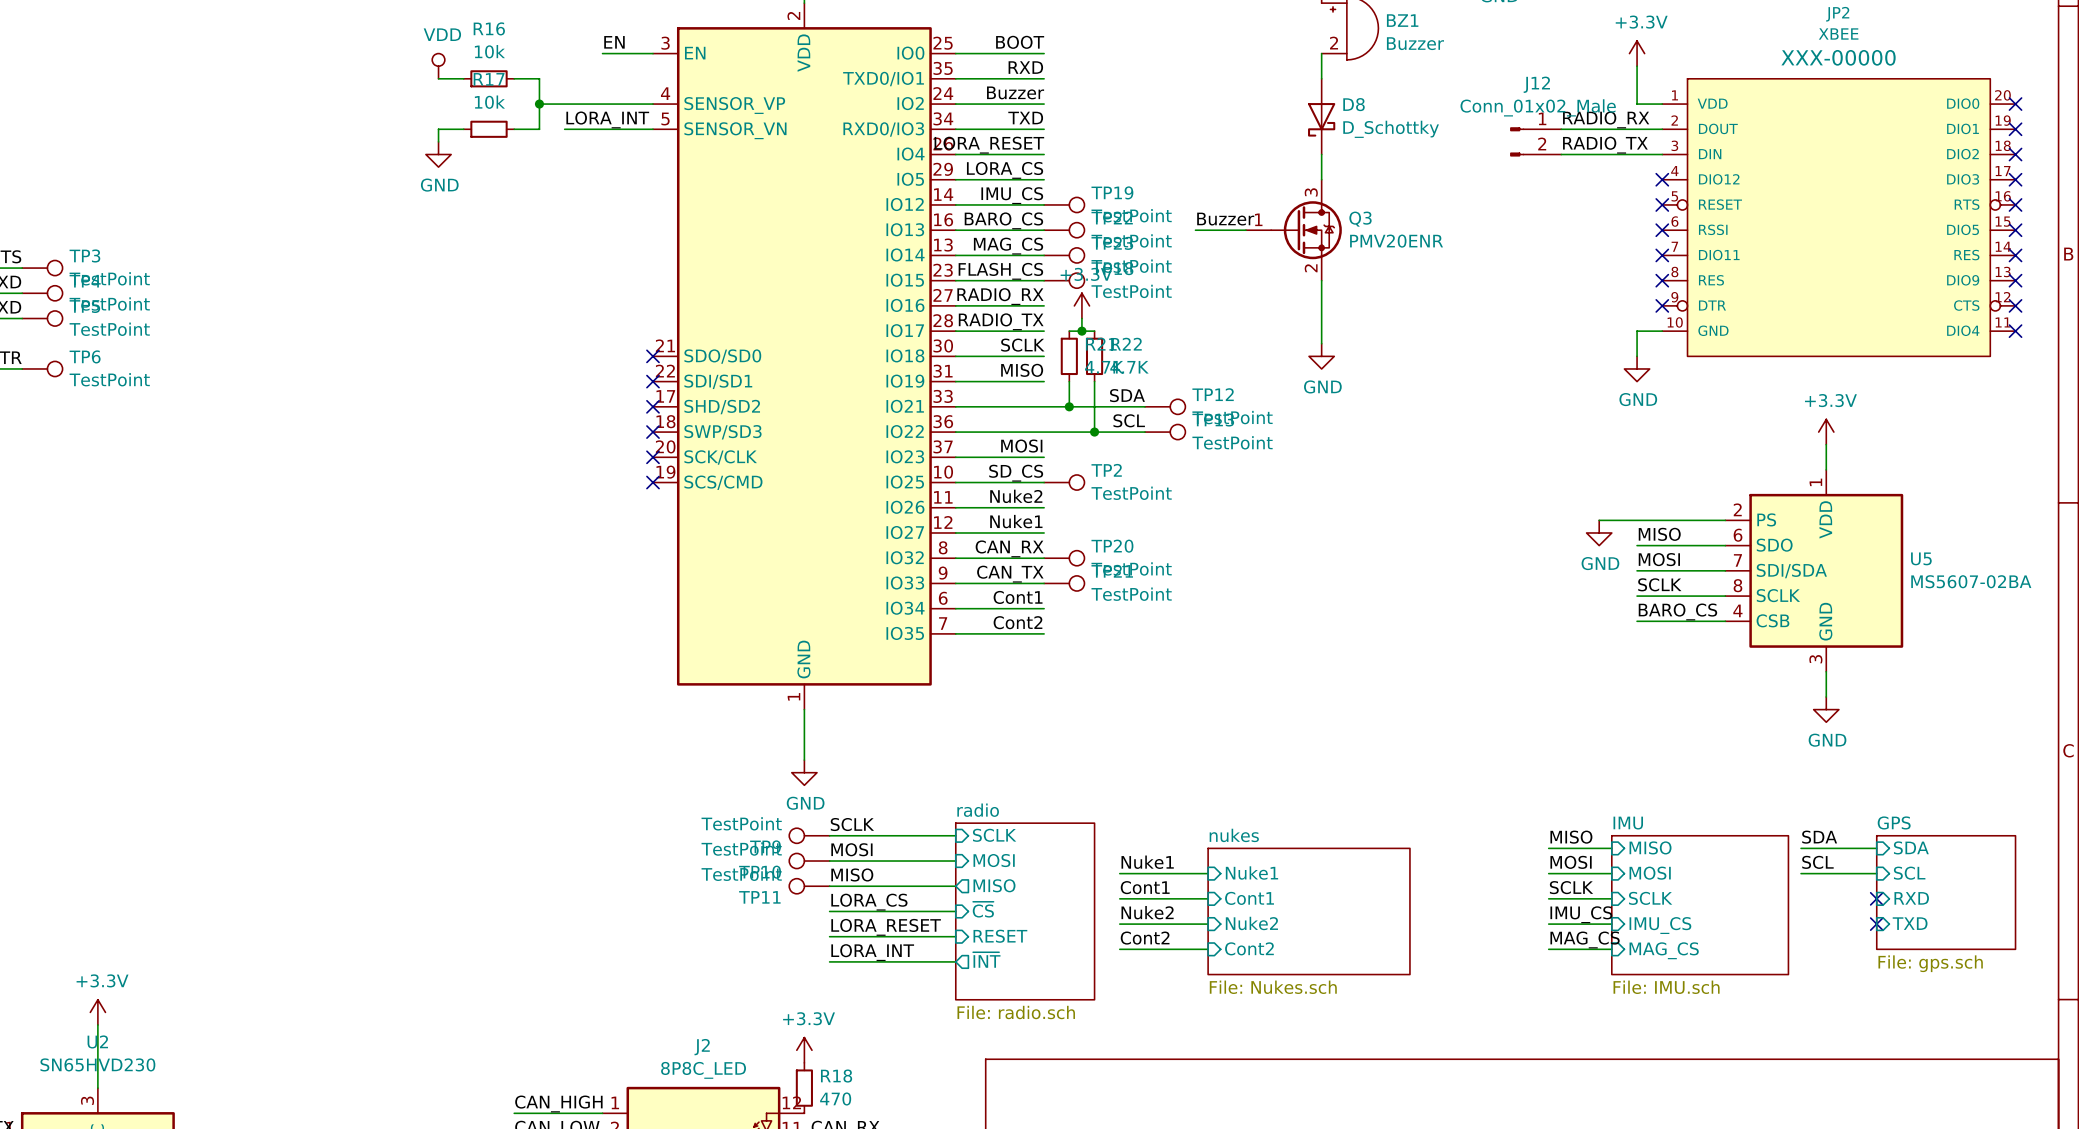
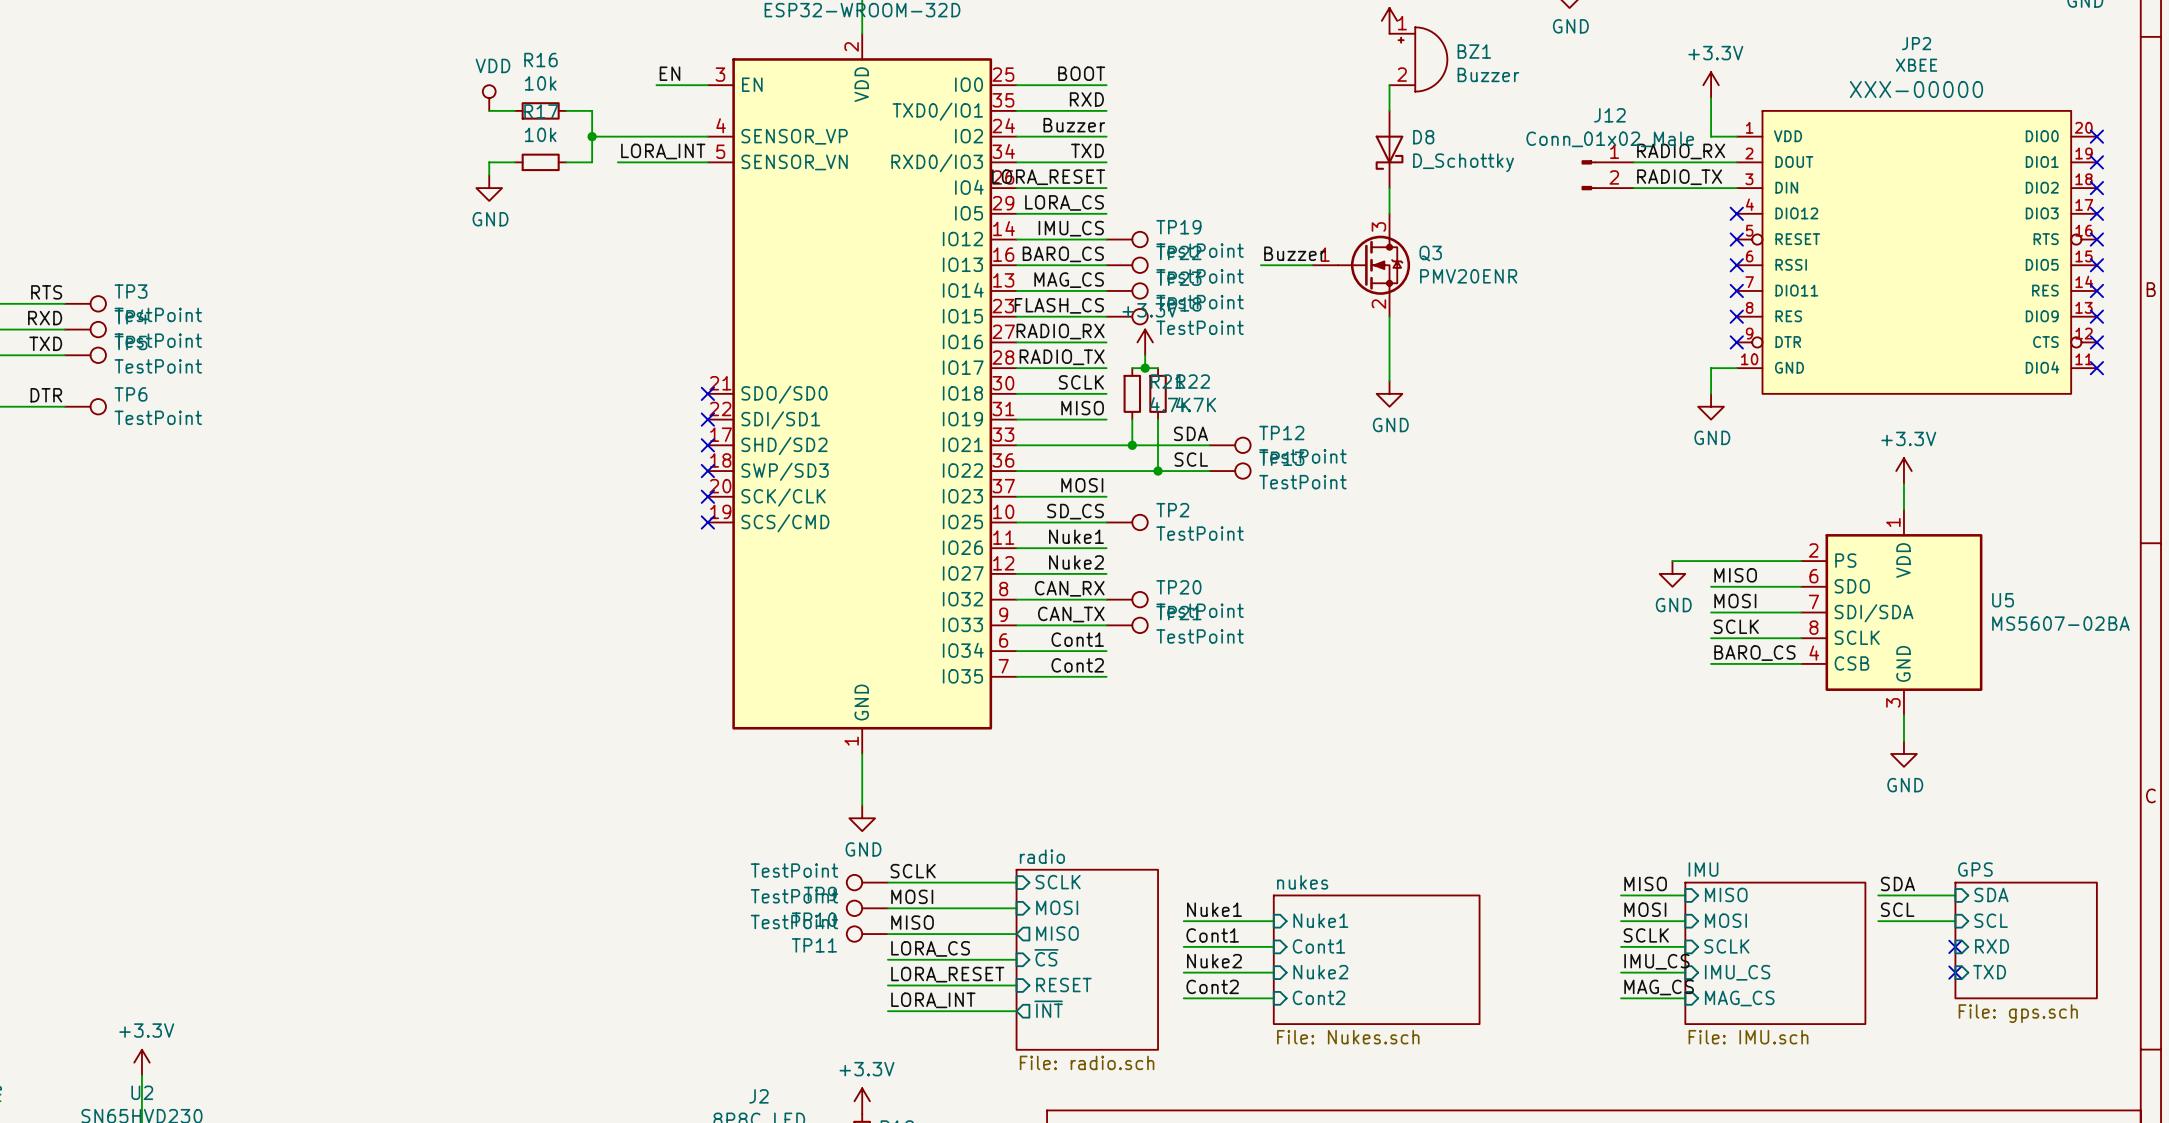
label: Nuke2 (1016, 496) -> Nuke1 (1076, 536)
label: Nuke1 (1016, 521) -> Nuke2 (1076, 562)

